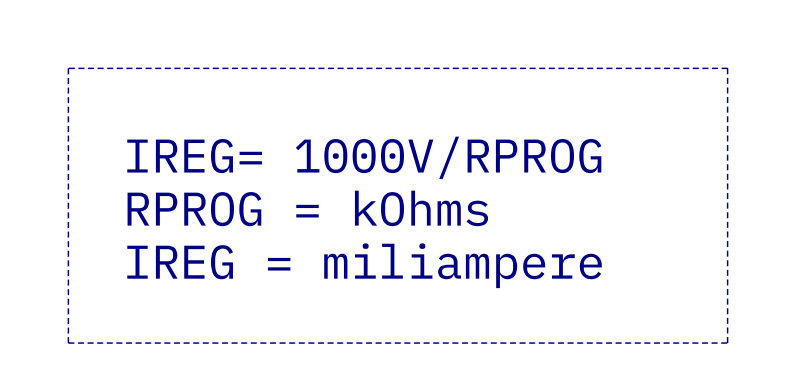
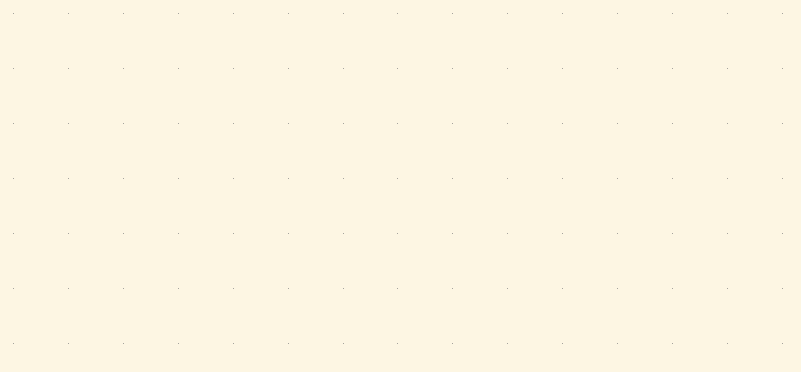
line: (68, 68) (68, 343) (727, 343) (727, 68) (68, 68) -> none
text: IREG= 1000V/RPROG (364, 157) -> none
text: RPROG = kOhms (307, 208) -> none
text: IREG = miliampere (364, 265) -> none

